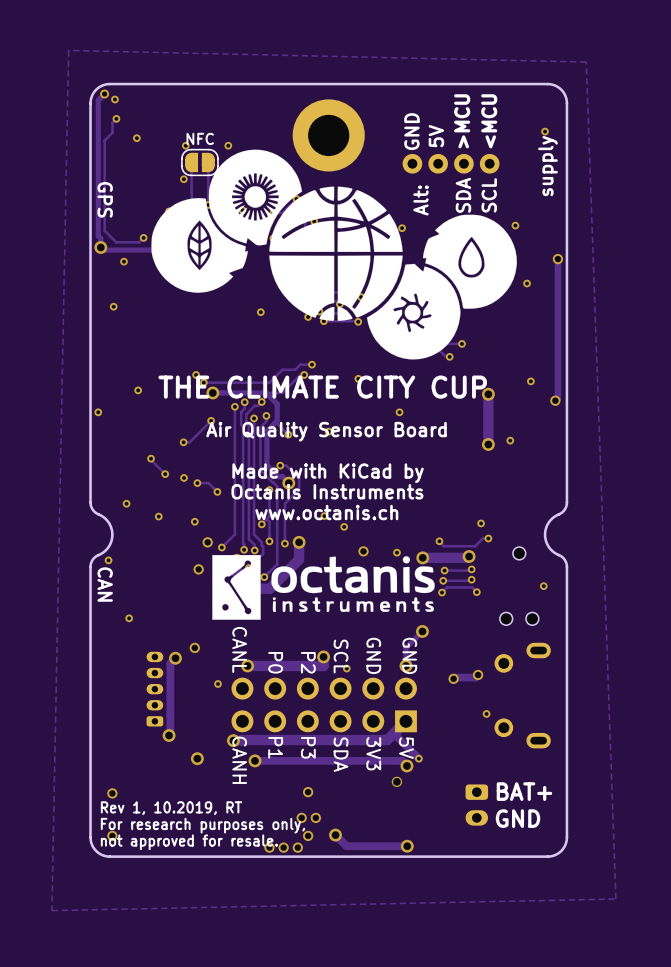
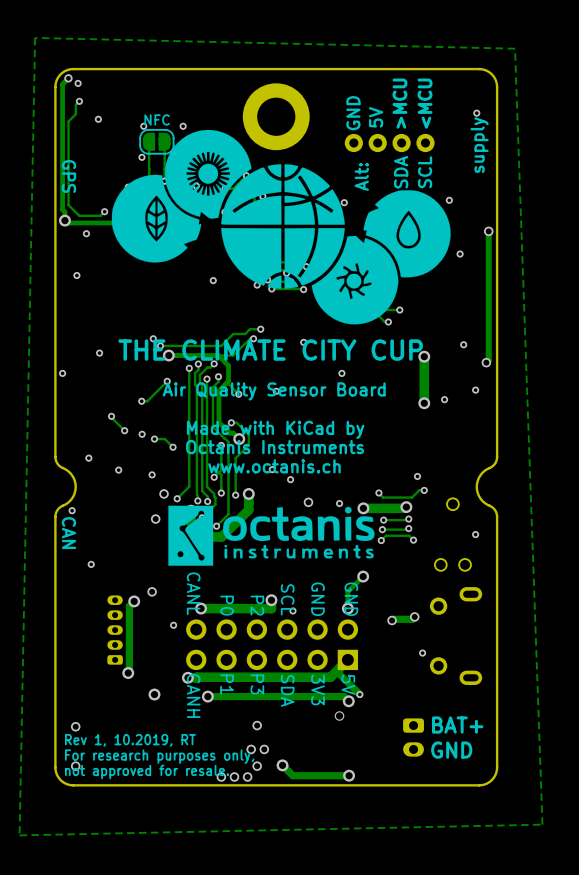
via: none -> (475, 390)

